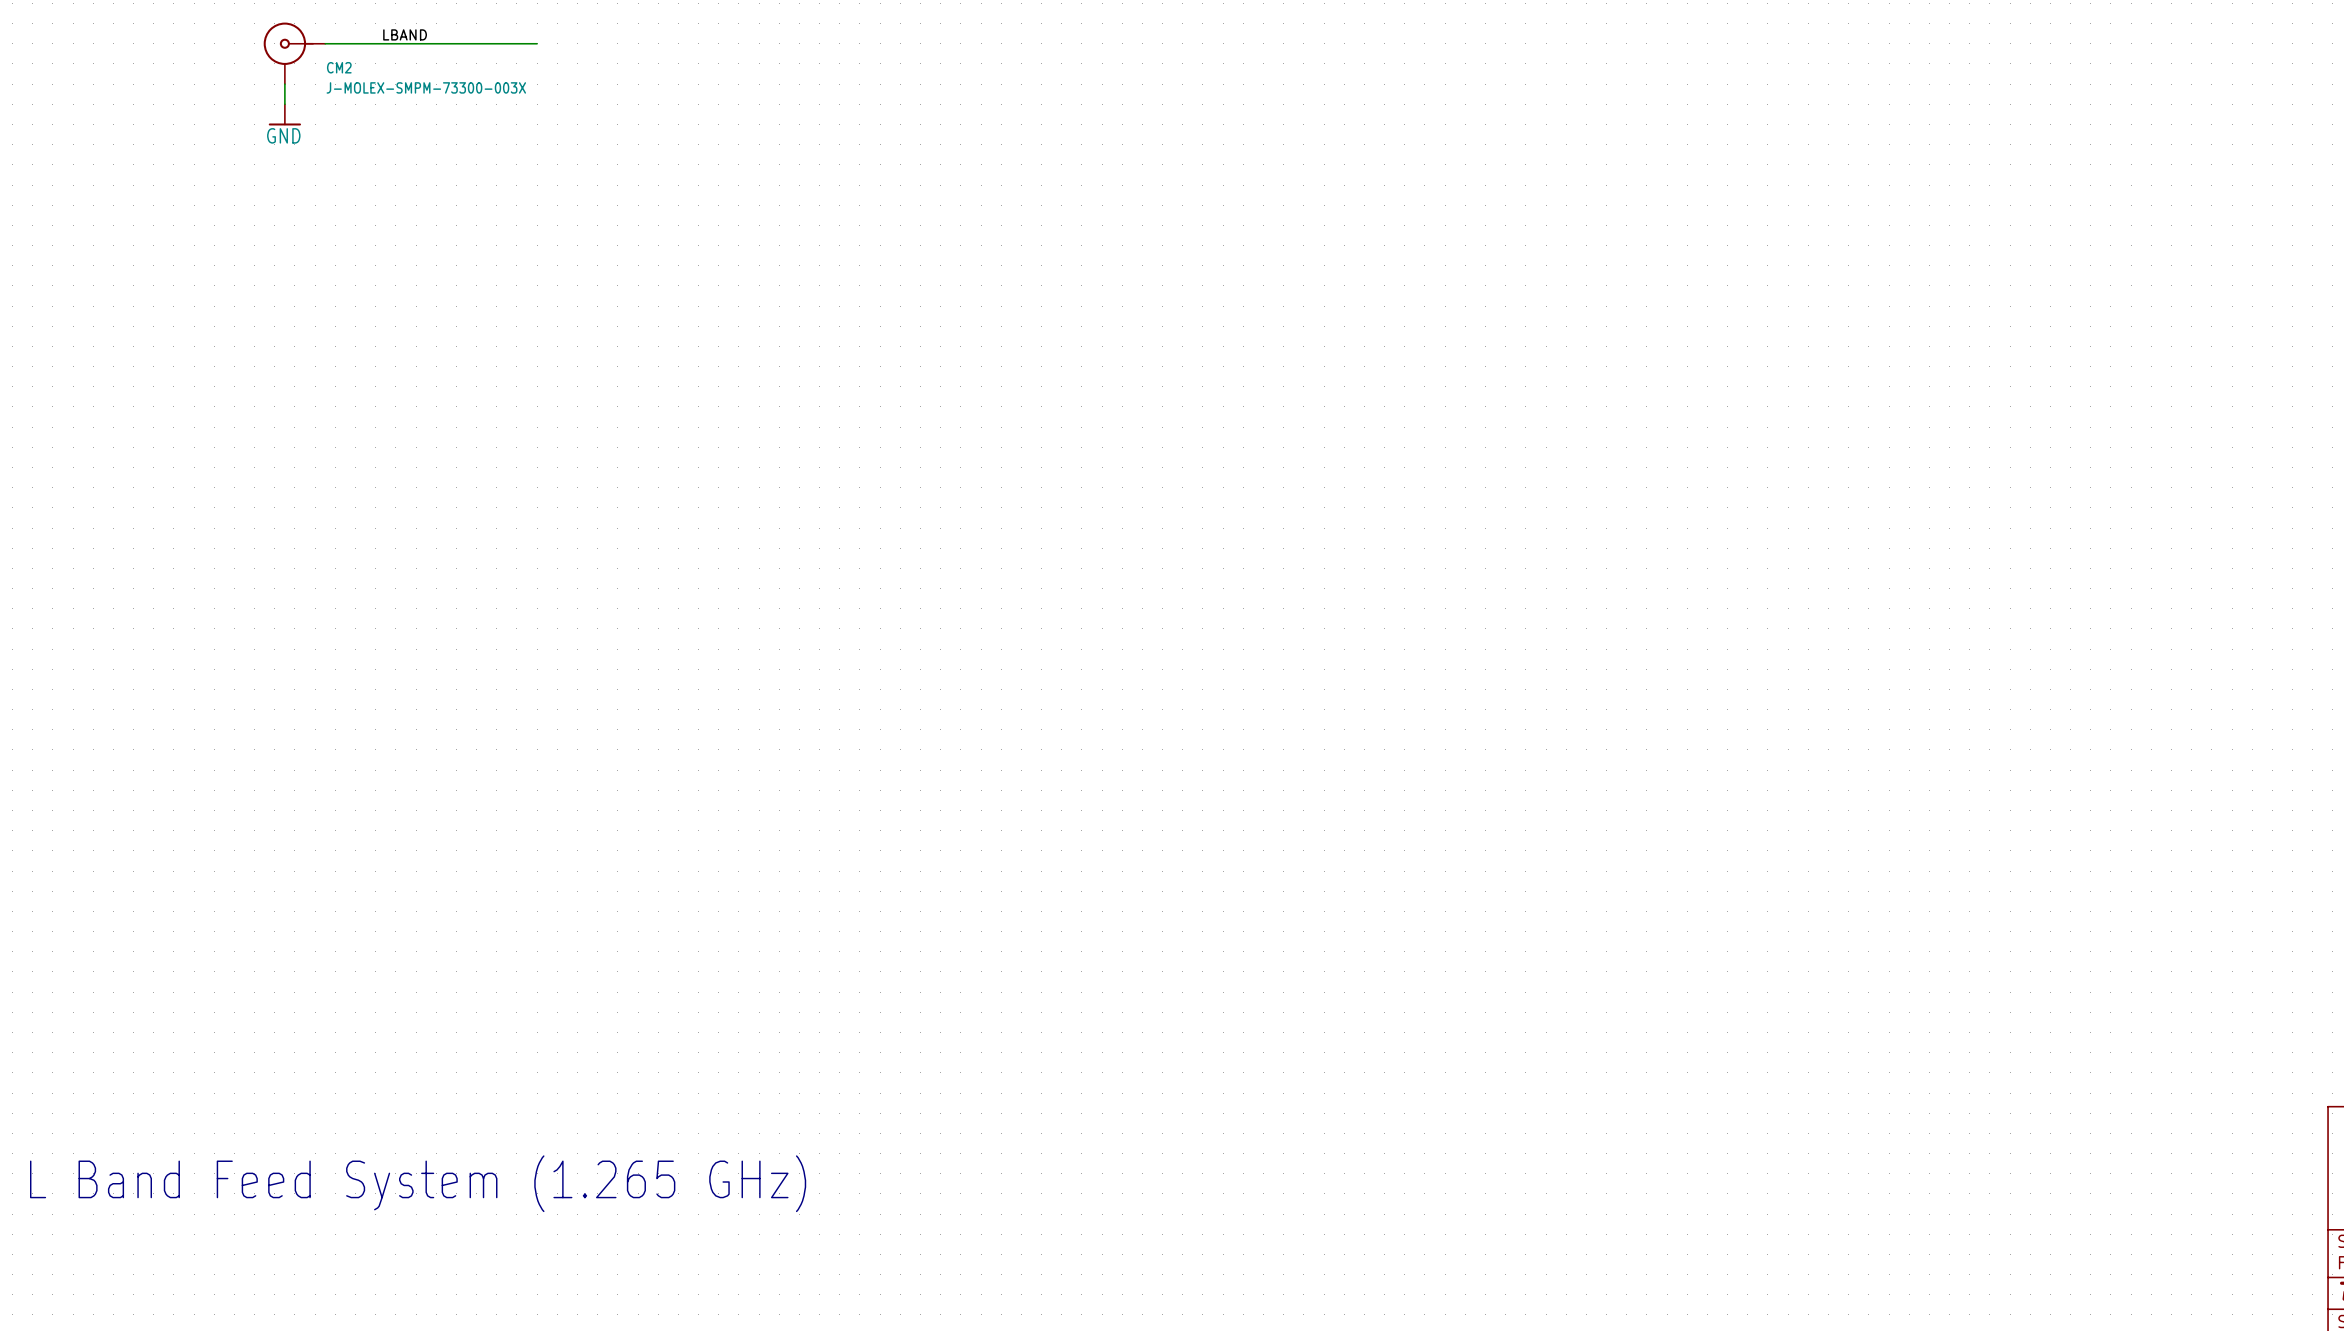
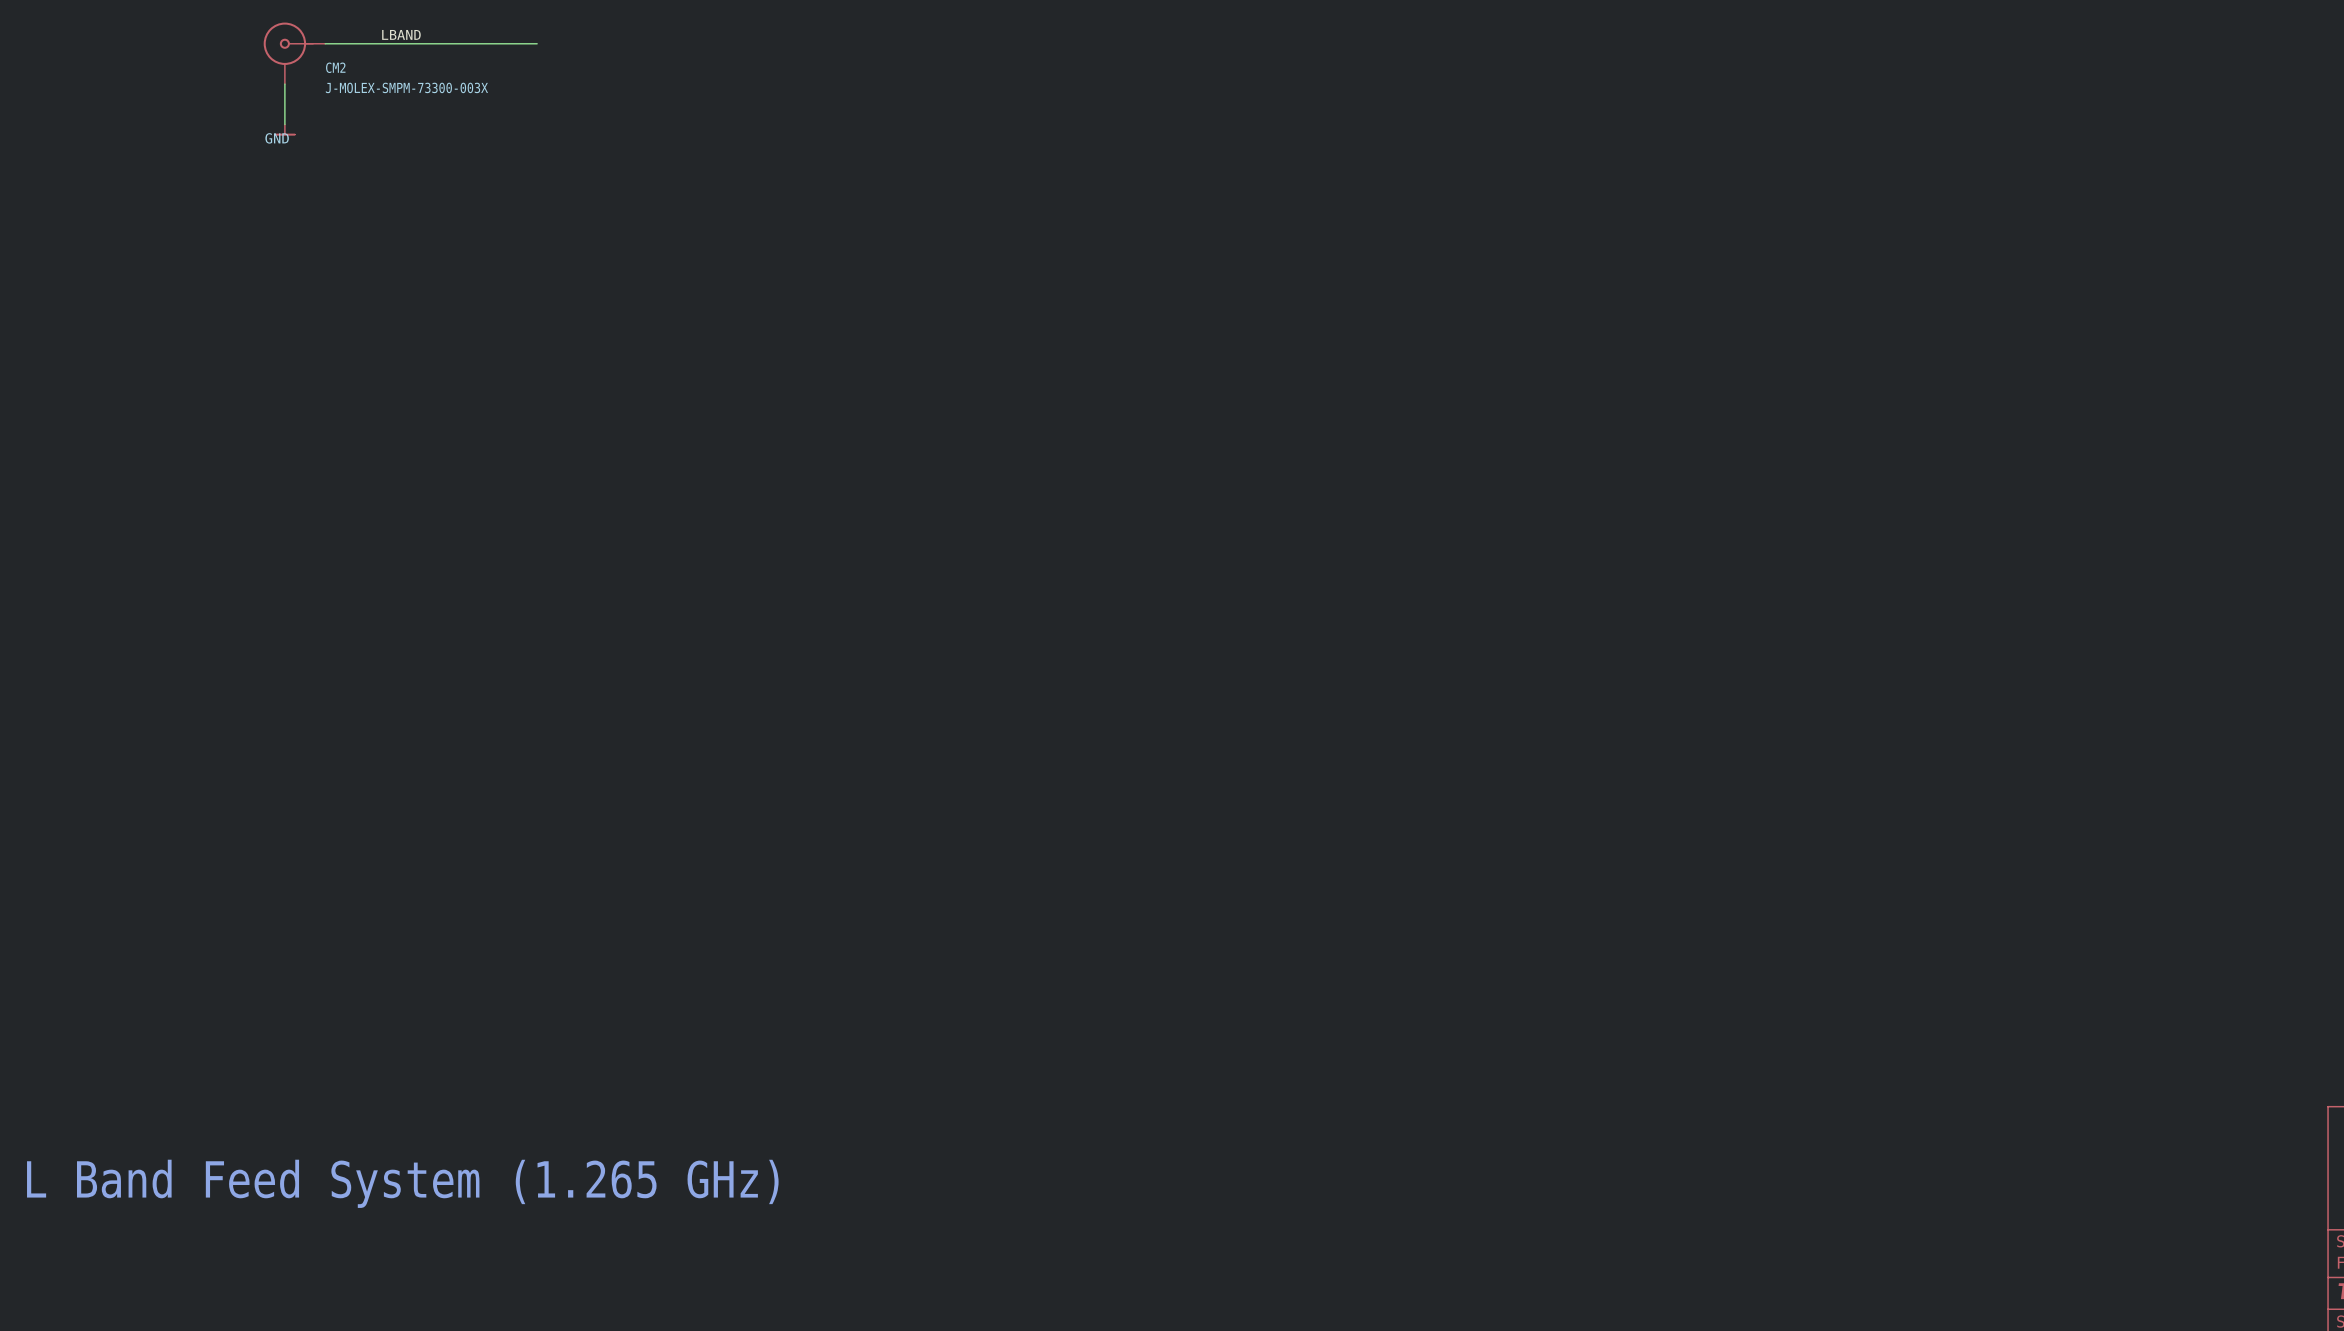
power symbol: GND (284, 114) -> none
power symbol: none -> GND (284, 129)

